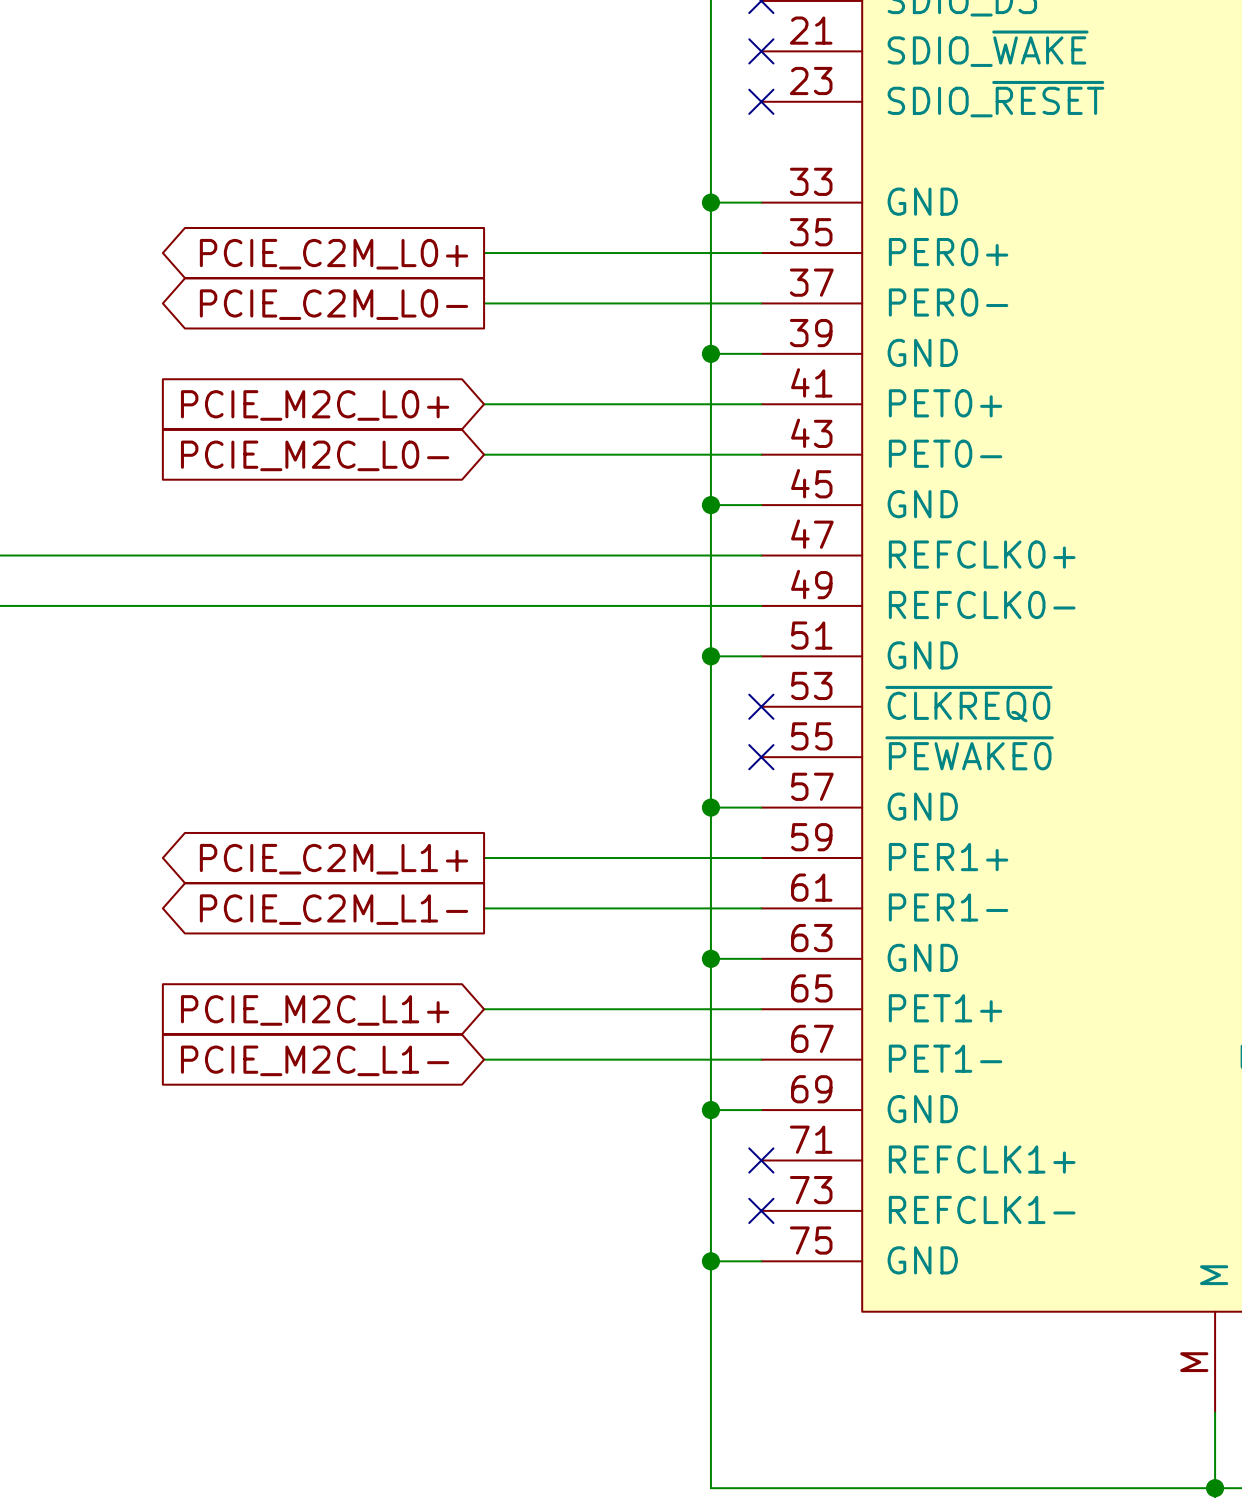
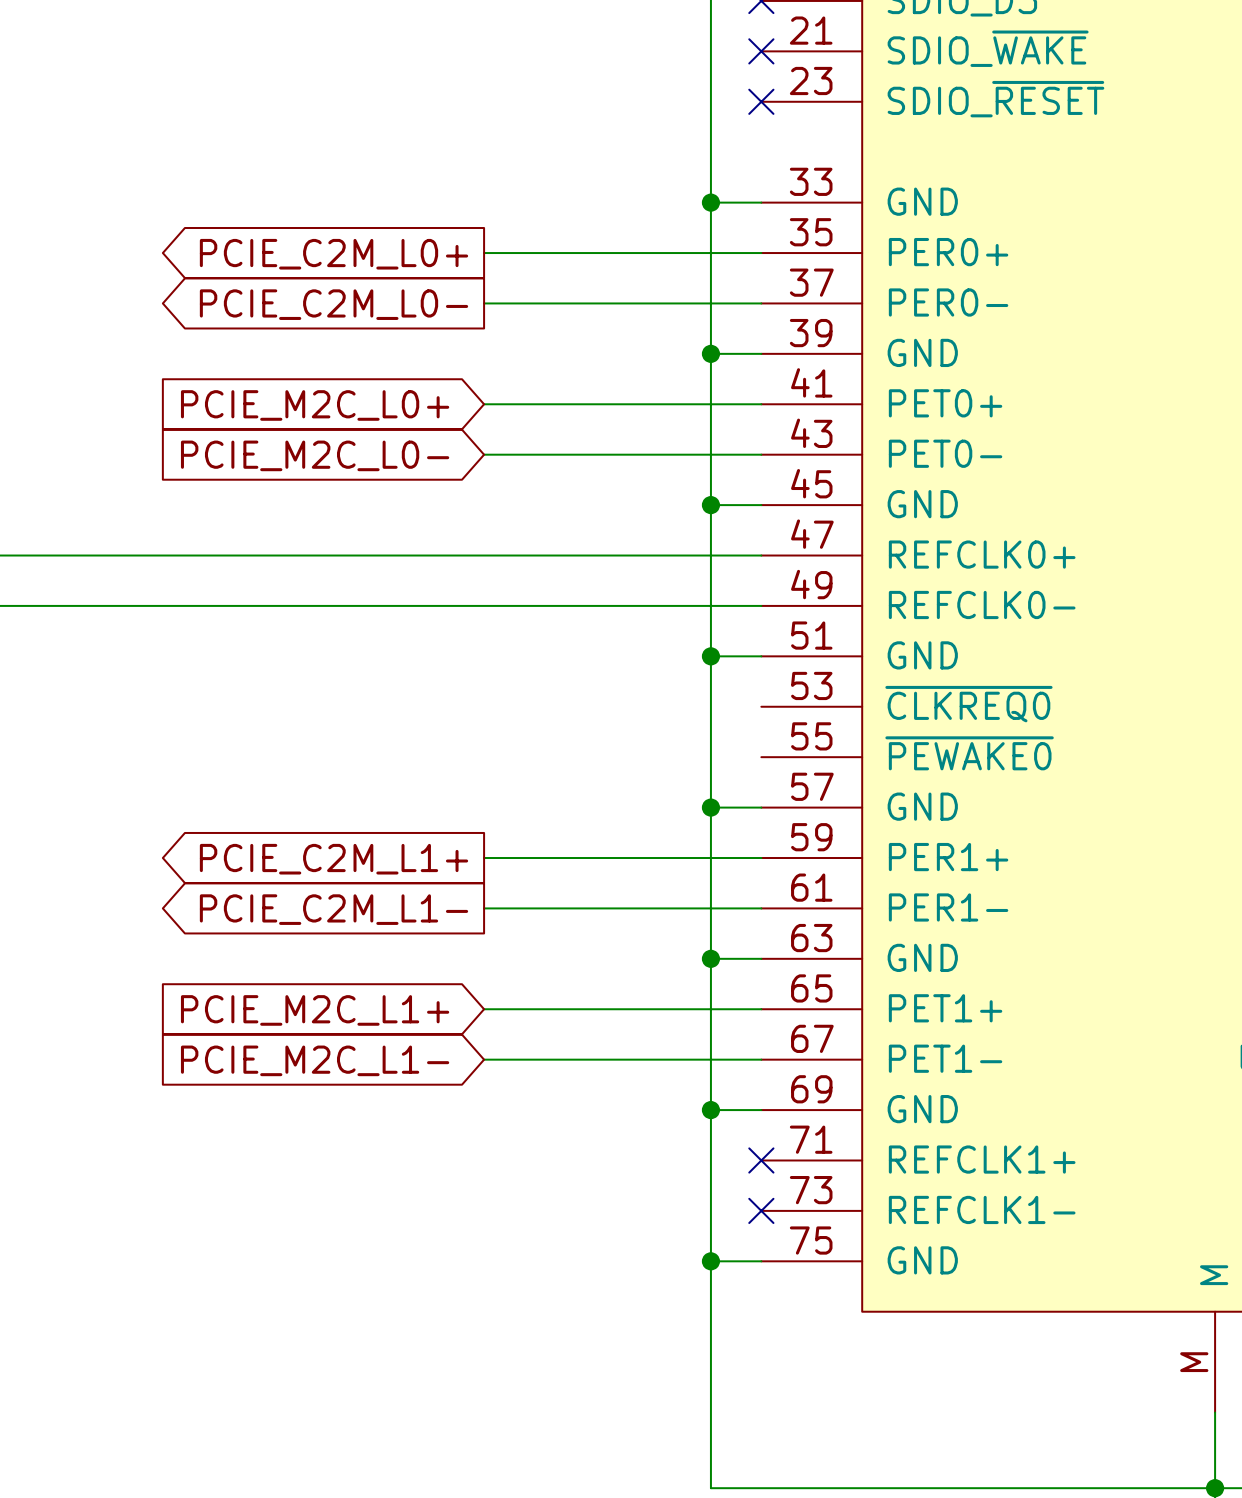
no-connect mark: (761, 706) -> none
no-connect mark: (761, 757) -> none

